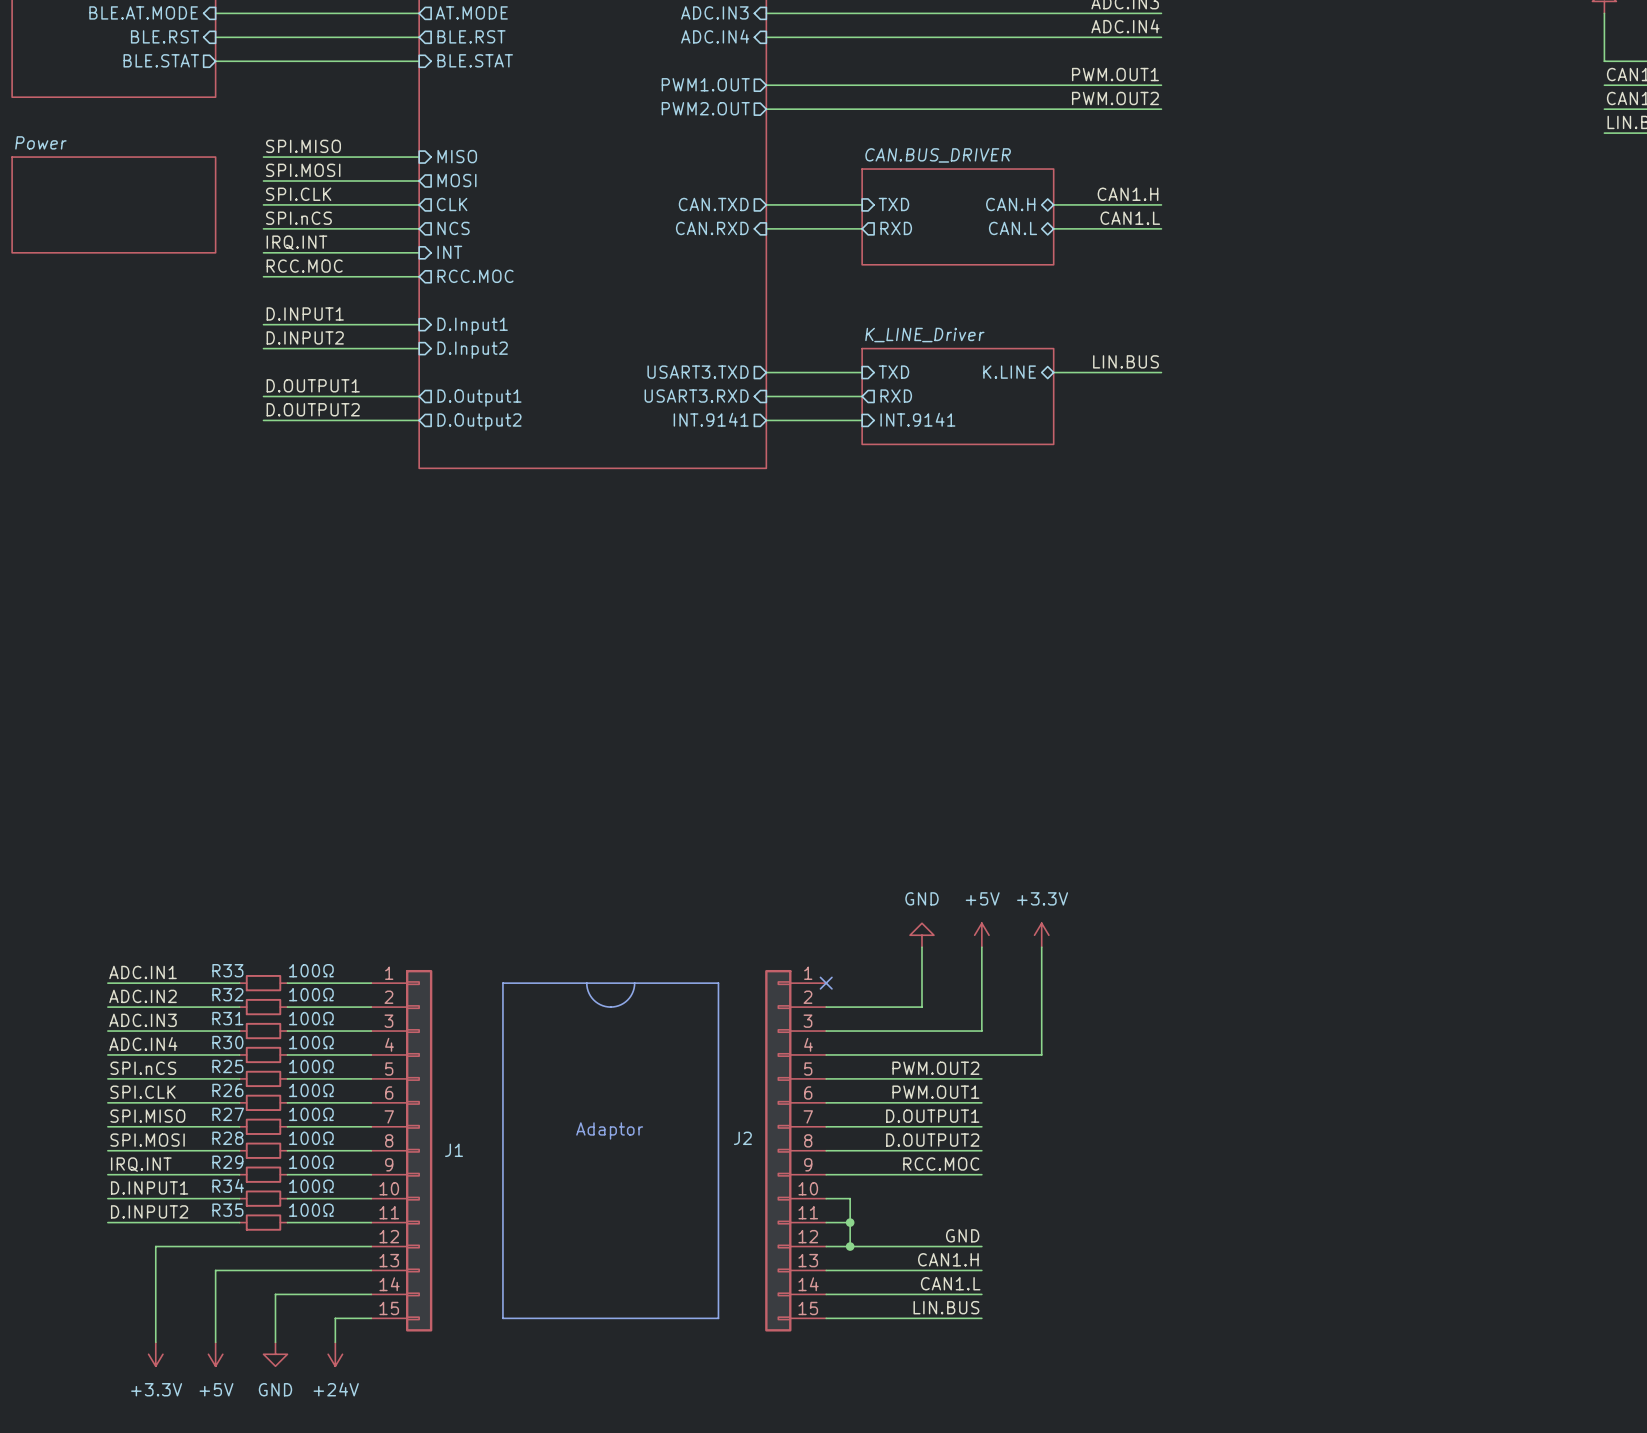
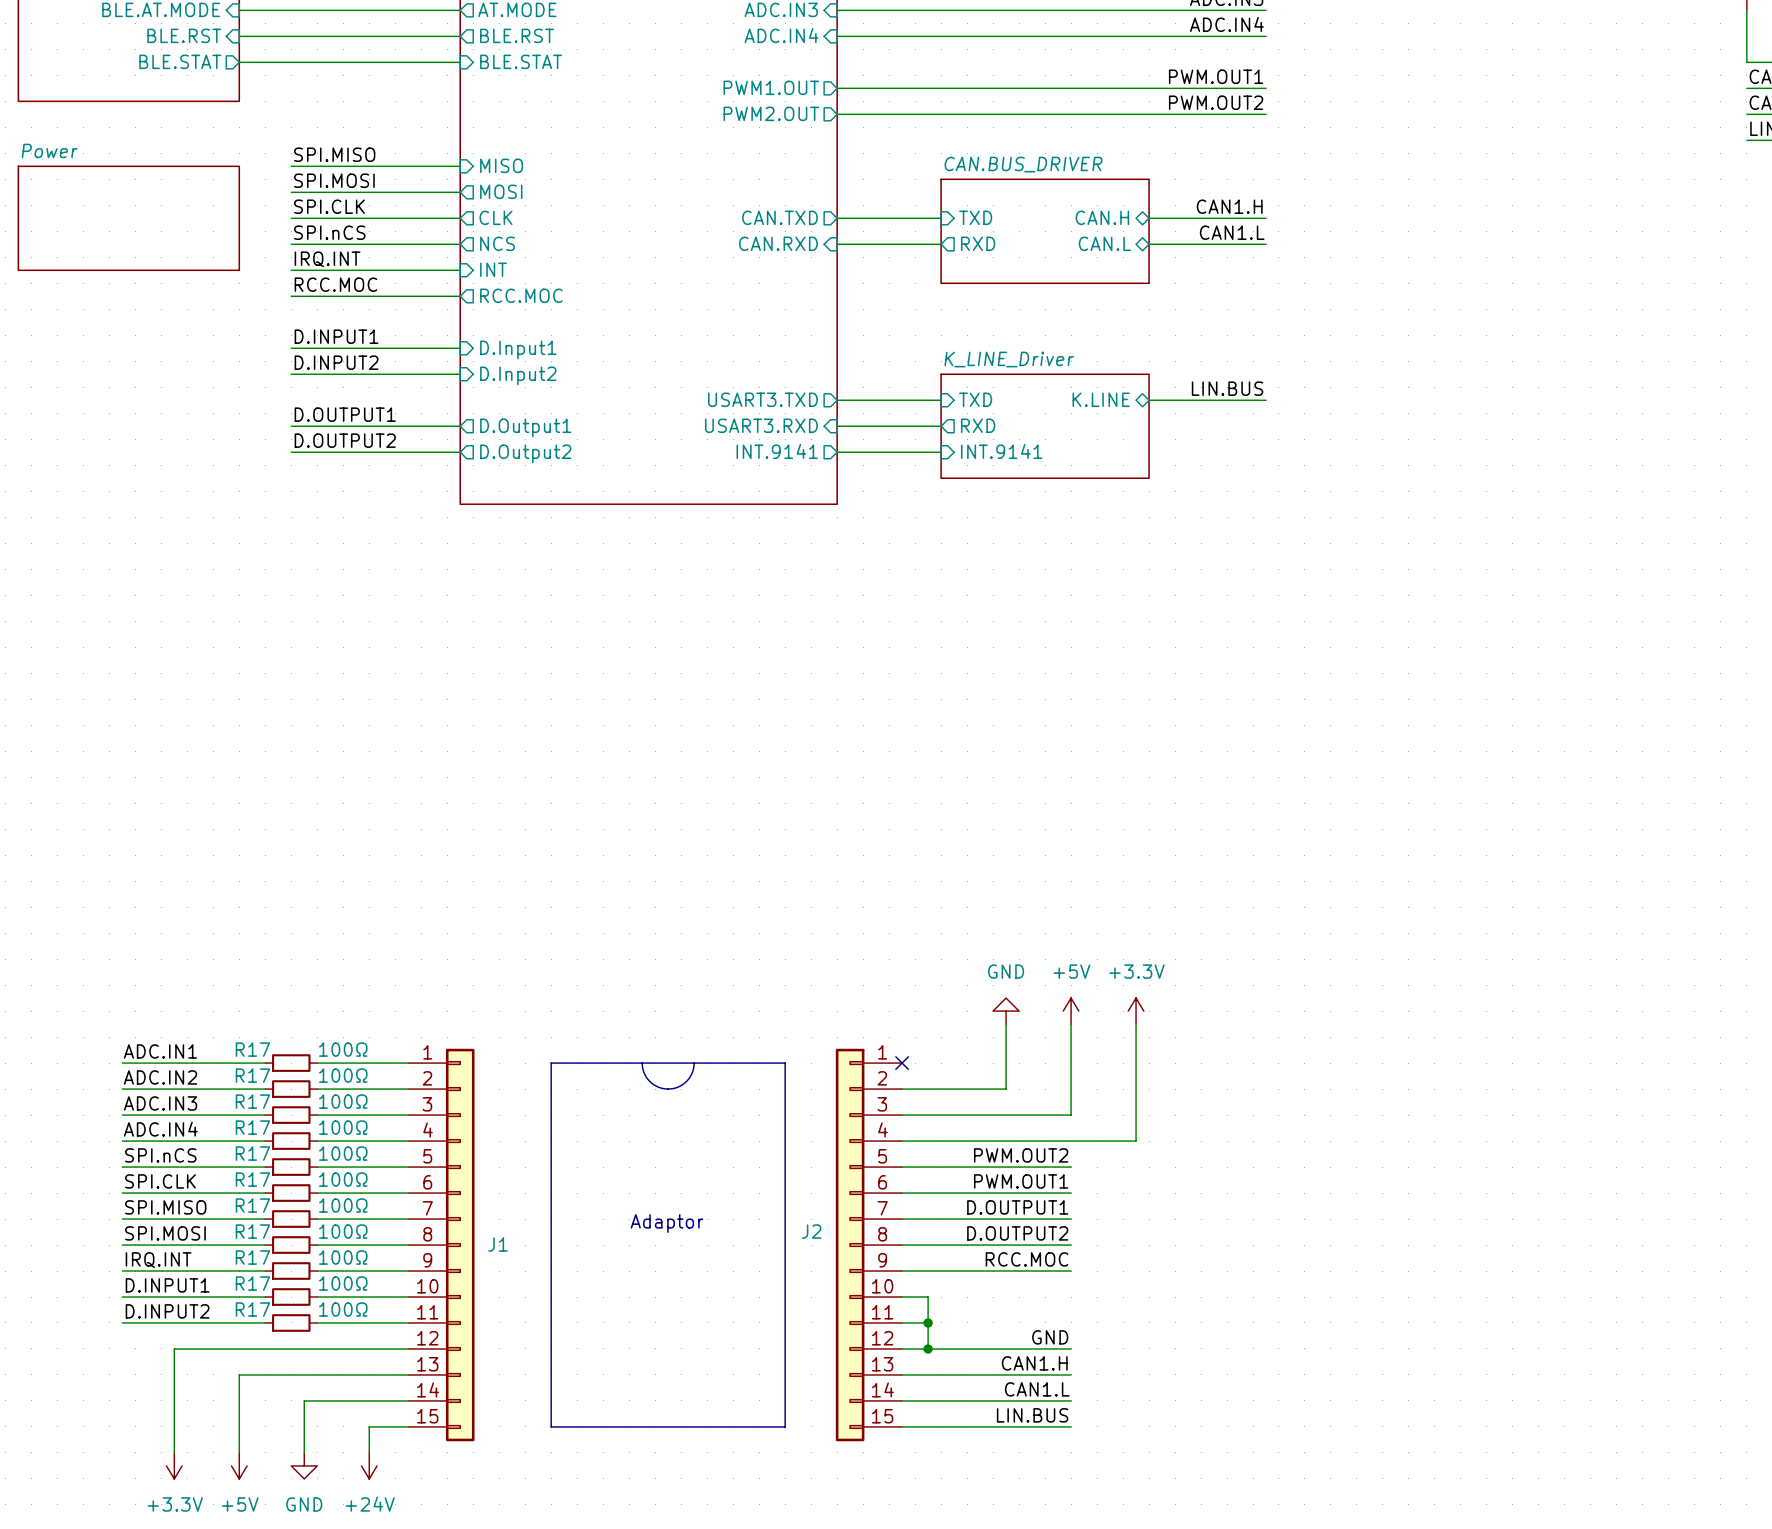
R33 name: R33 (227, 970) -> R17 (252, 1049)
R32 name: R32 (227, 994) -> R17 (252, 1075)
R31 name: R31 (227, 1018) -> R17 (252, 1101)
R30 name: R30 (227, 1042) -> R17 (252, 1127)
R25 name: R25 (227, 1066) -> R17 (252, 1153)
R26 name: R26 (227, 1090) -> R17 (252, 1179)
R27 name: R27 (228, 1114) -> R17 (252, 1205)
R28 name: R28 (227, 1138) -> R17 (252, 1231)
R29 name: R29 (227, 1162) -> R17 (252, 1257)
R34 name: R34 (228, 1185) -> R17 (252, 1283)
R35 name: R35 (227, 1210) -> R17 (252, 1309)

